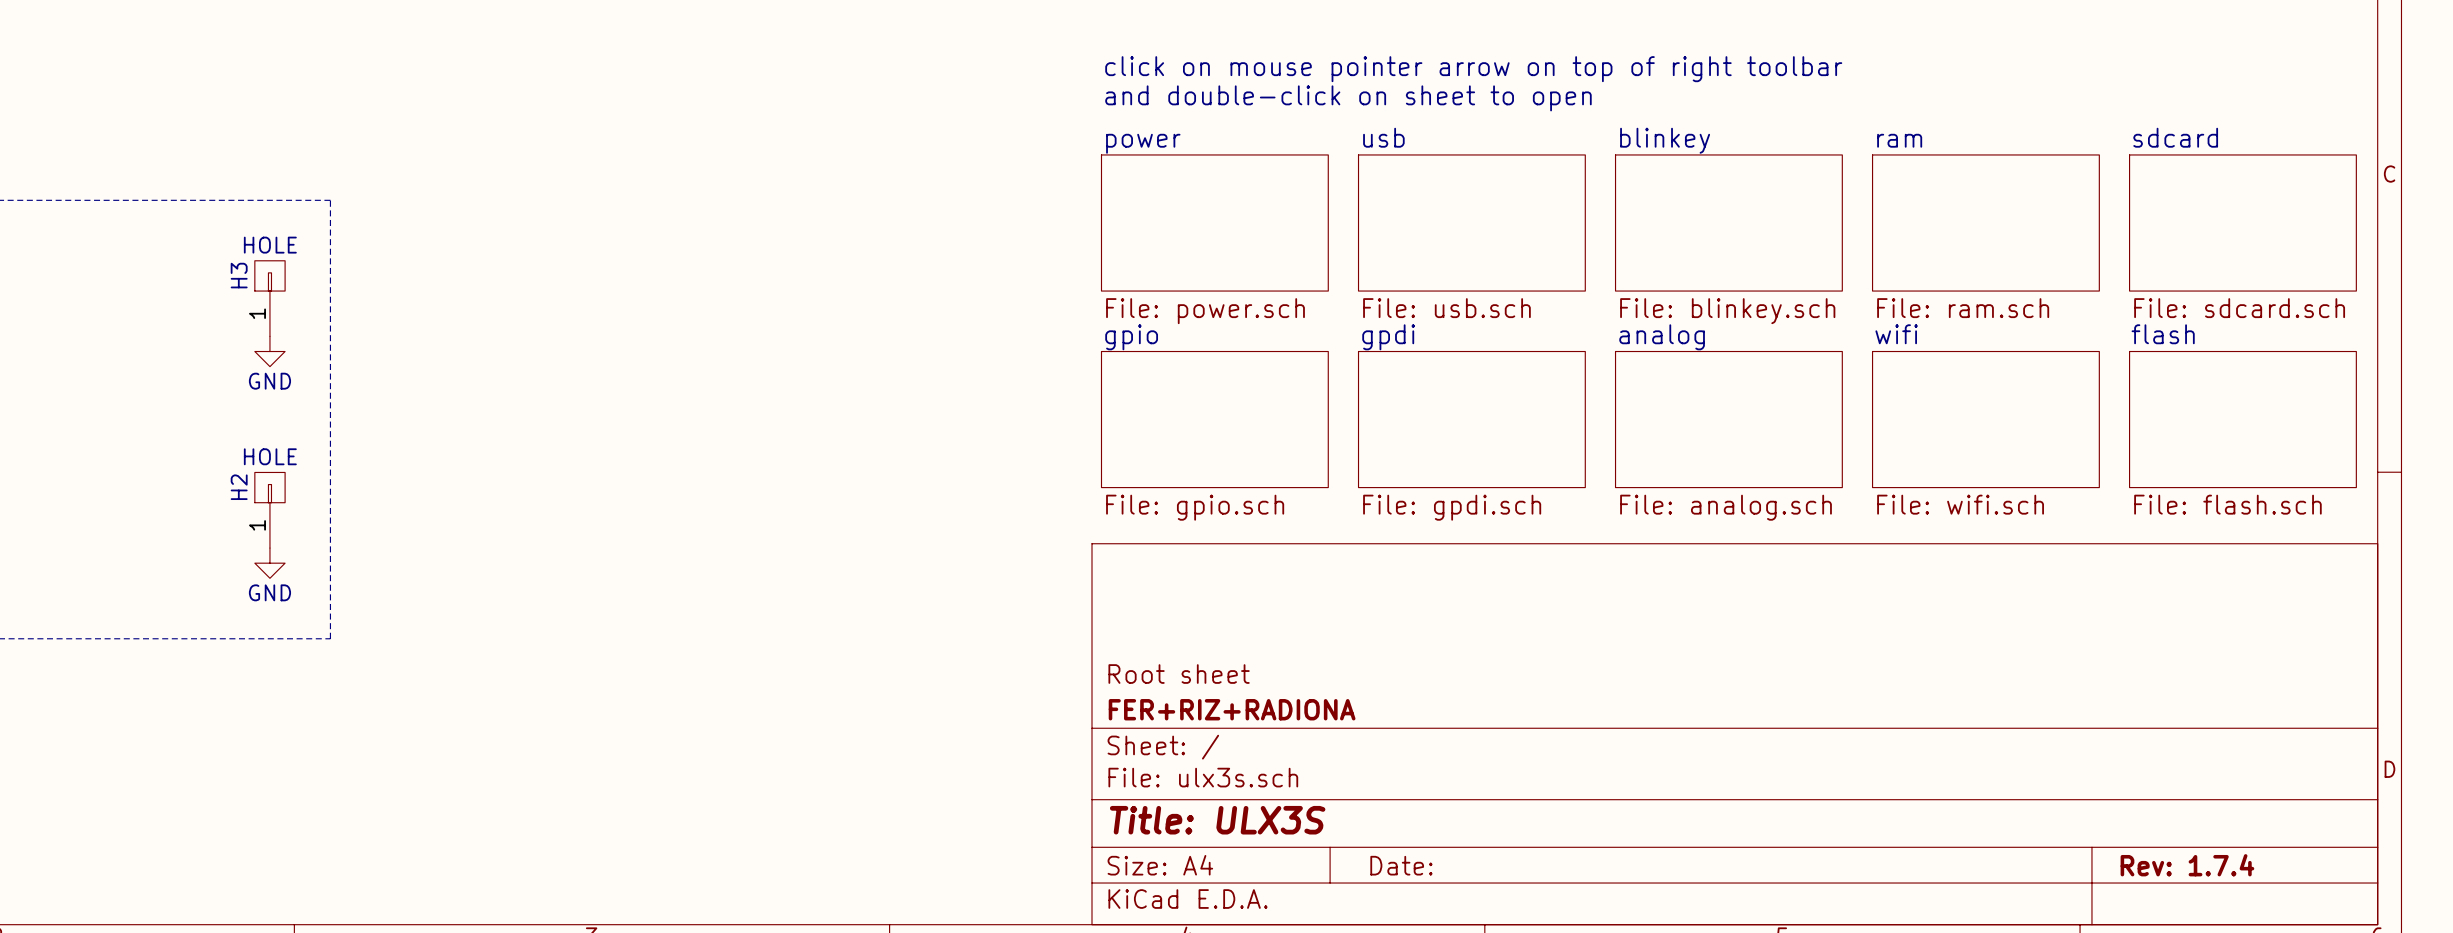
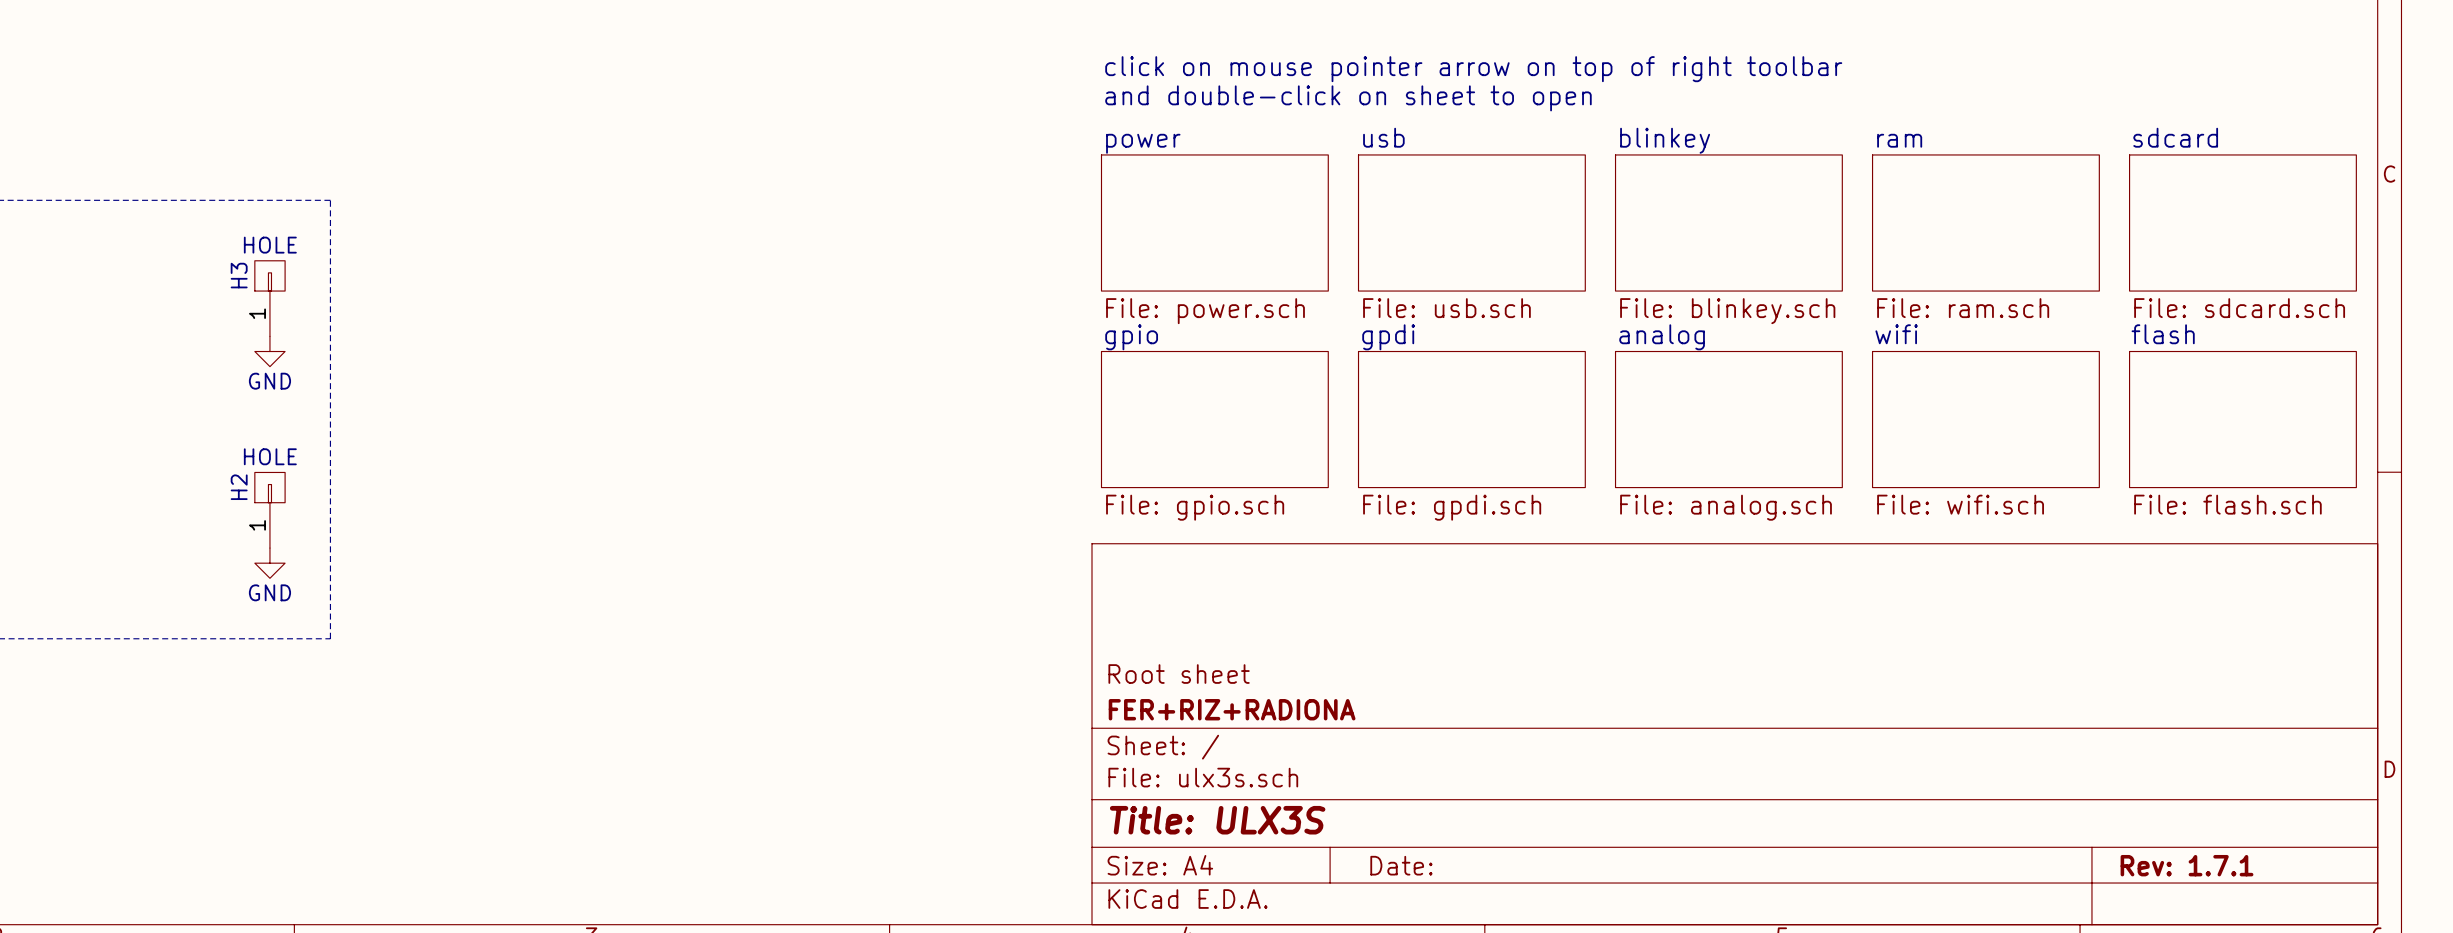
title block: Rev: 1.7.4 (2187, 865) -> Rev: 1.7.1 (2187, 865)

